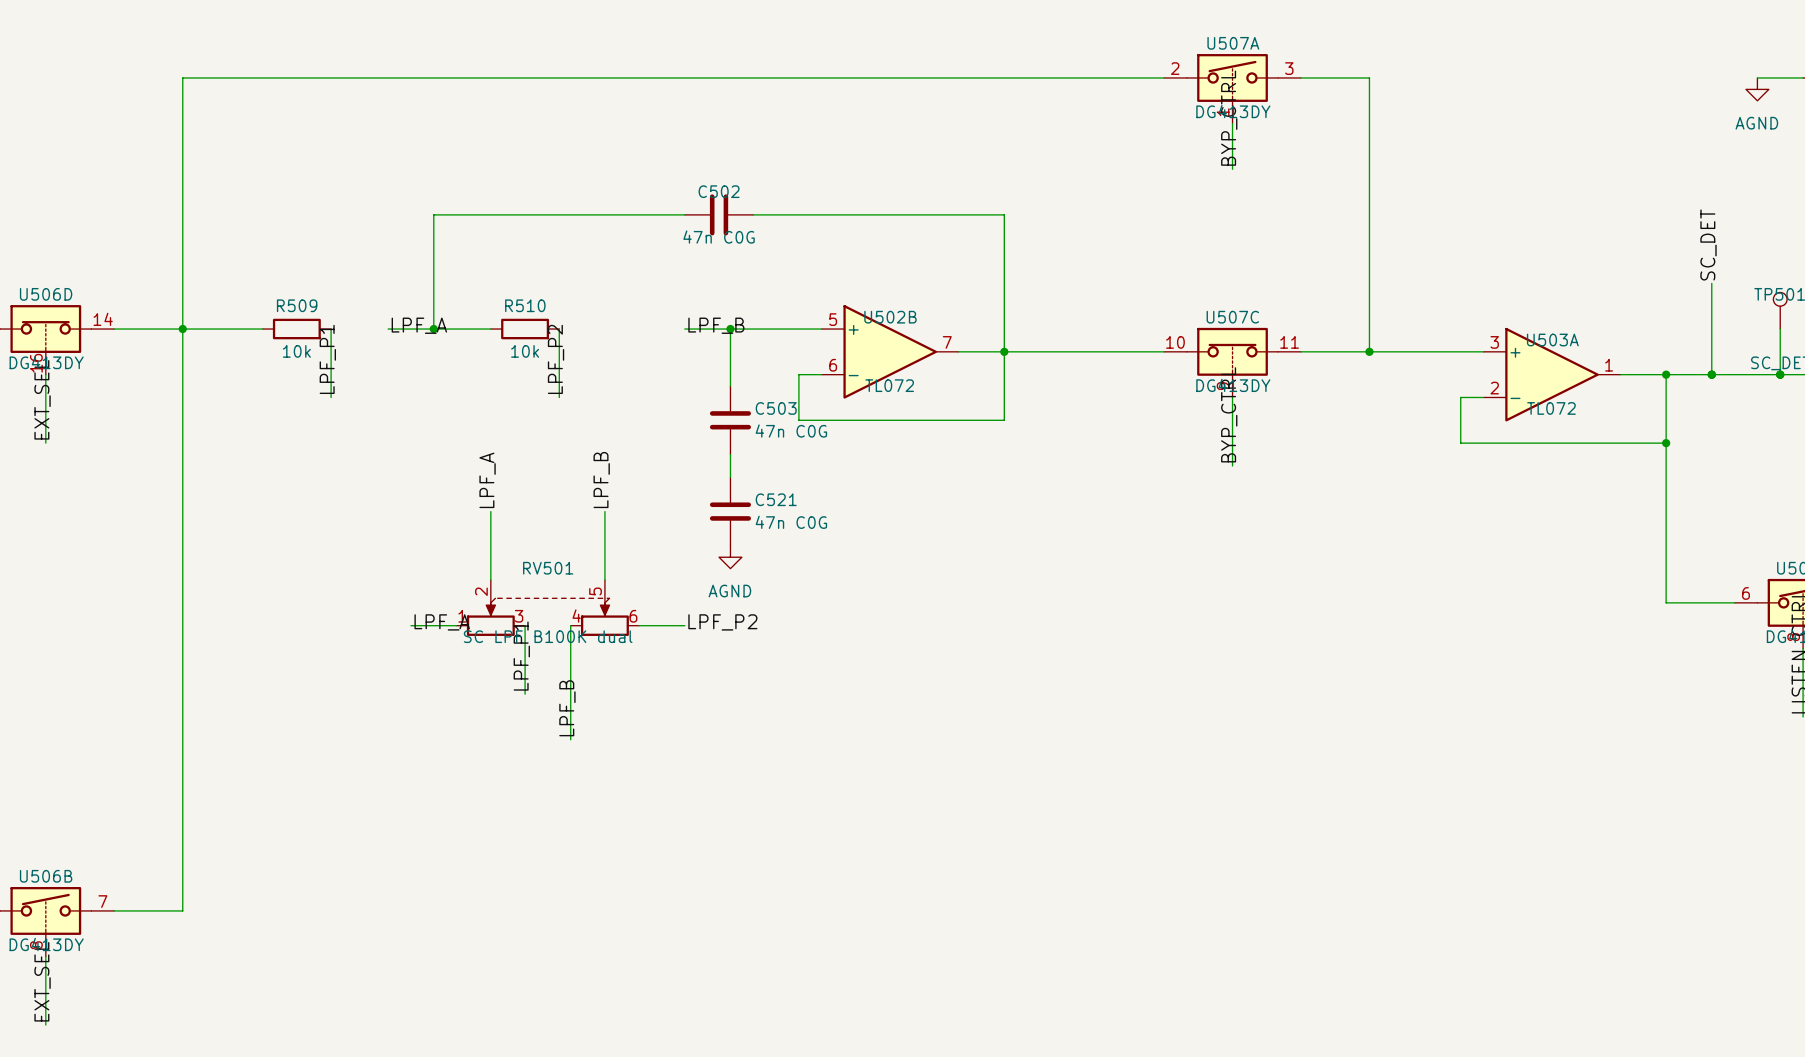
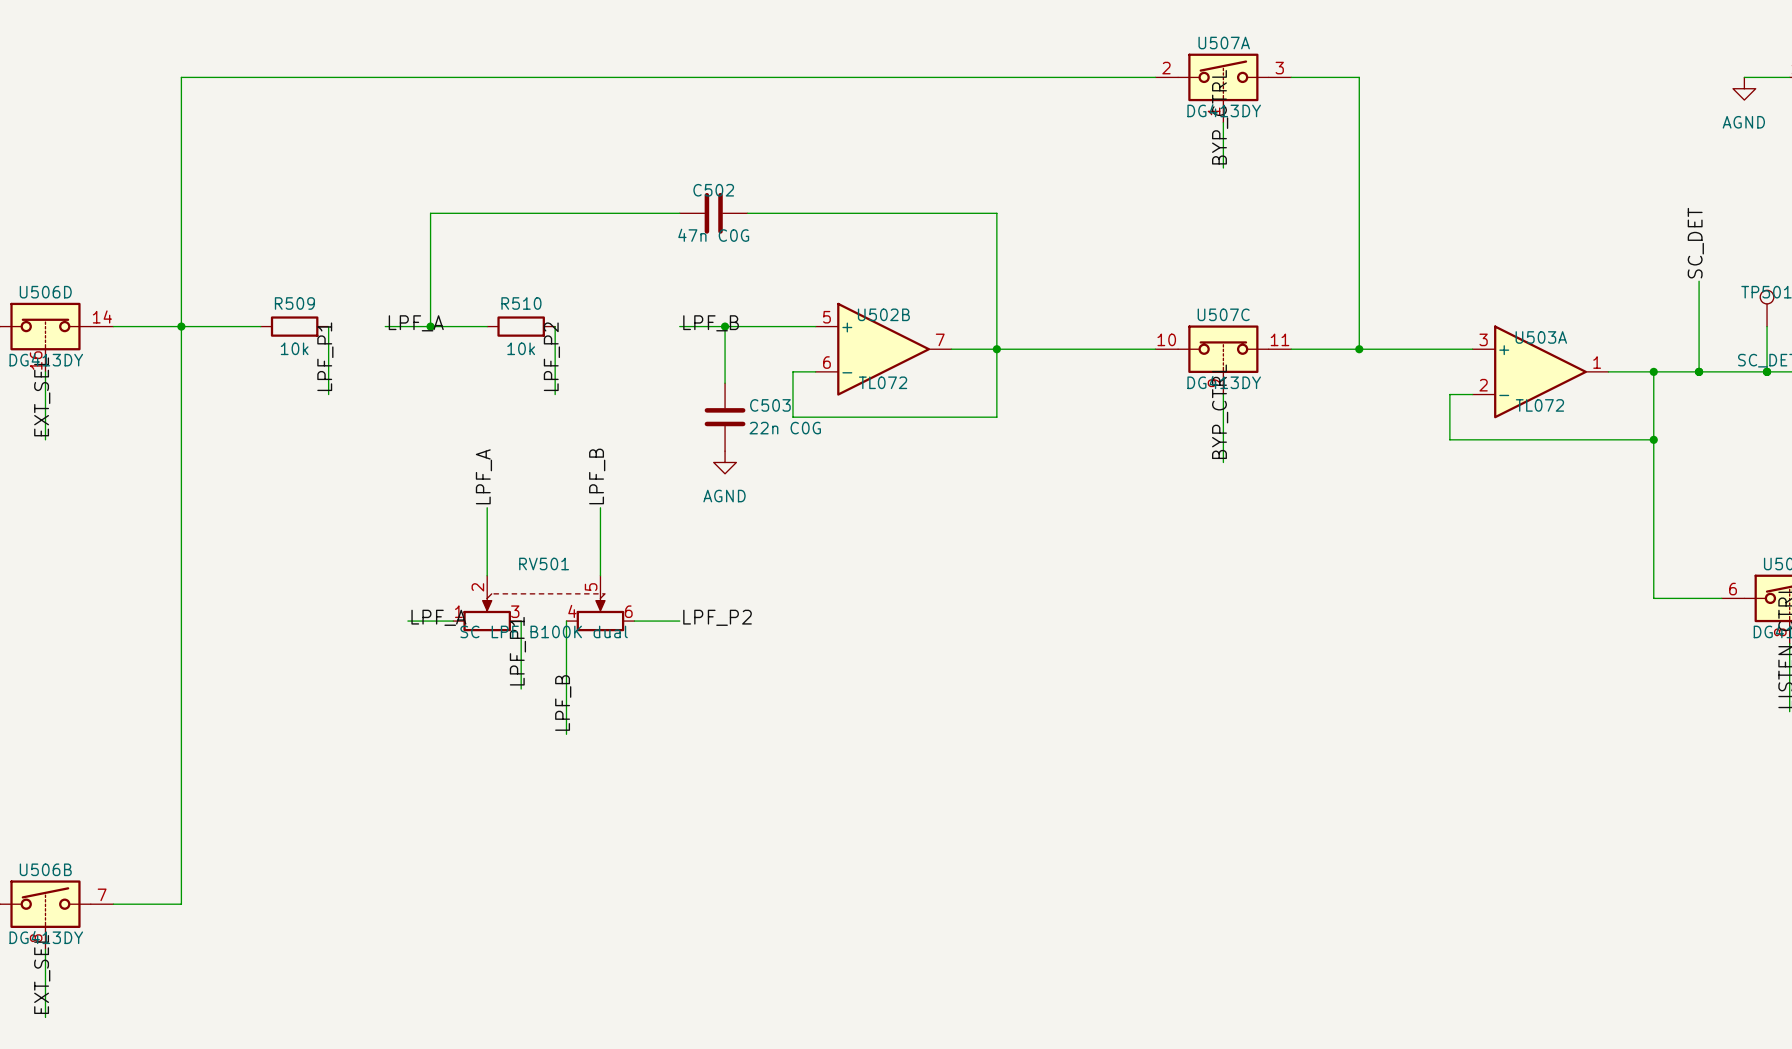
C503 value: 47n C0G (791, 431) -> 22n C0G (785, 428)
C521: 47n C0G (730, 511) -> none
power symbol position: AGND (730, 557) -> AGND (725, 462)

